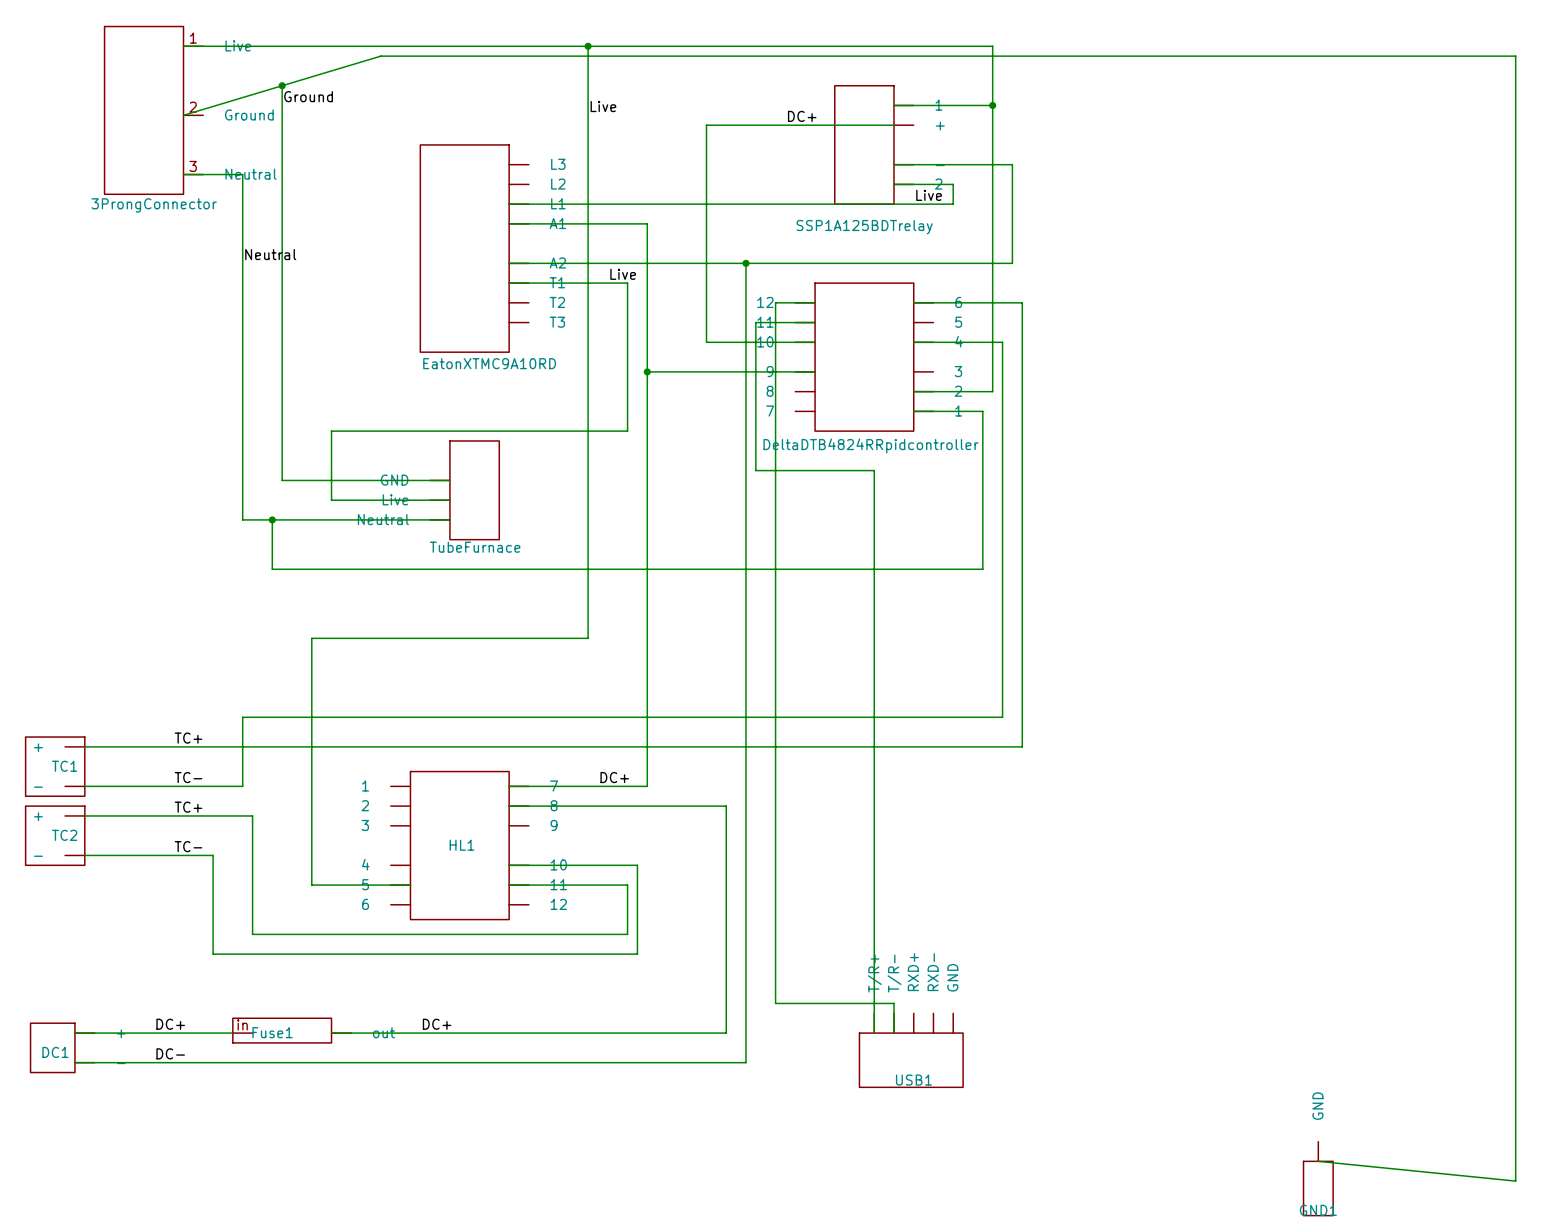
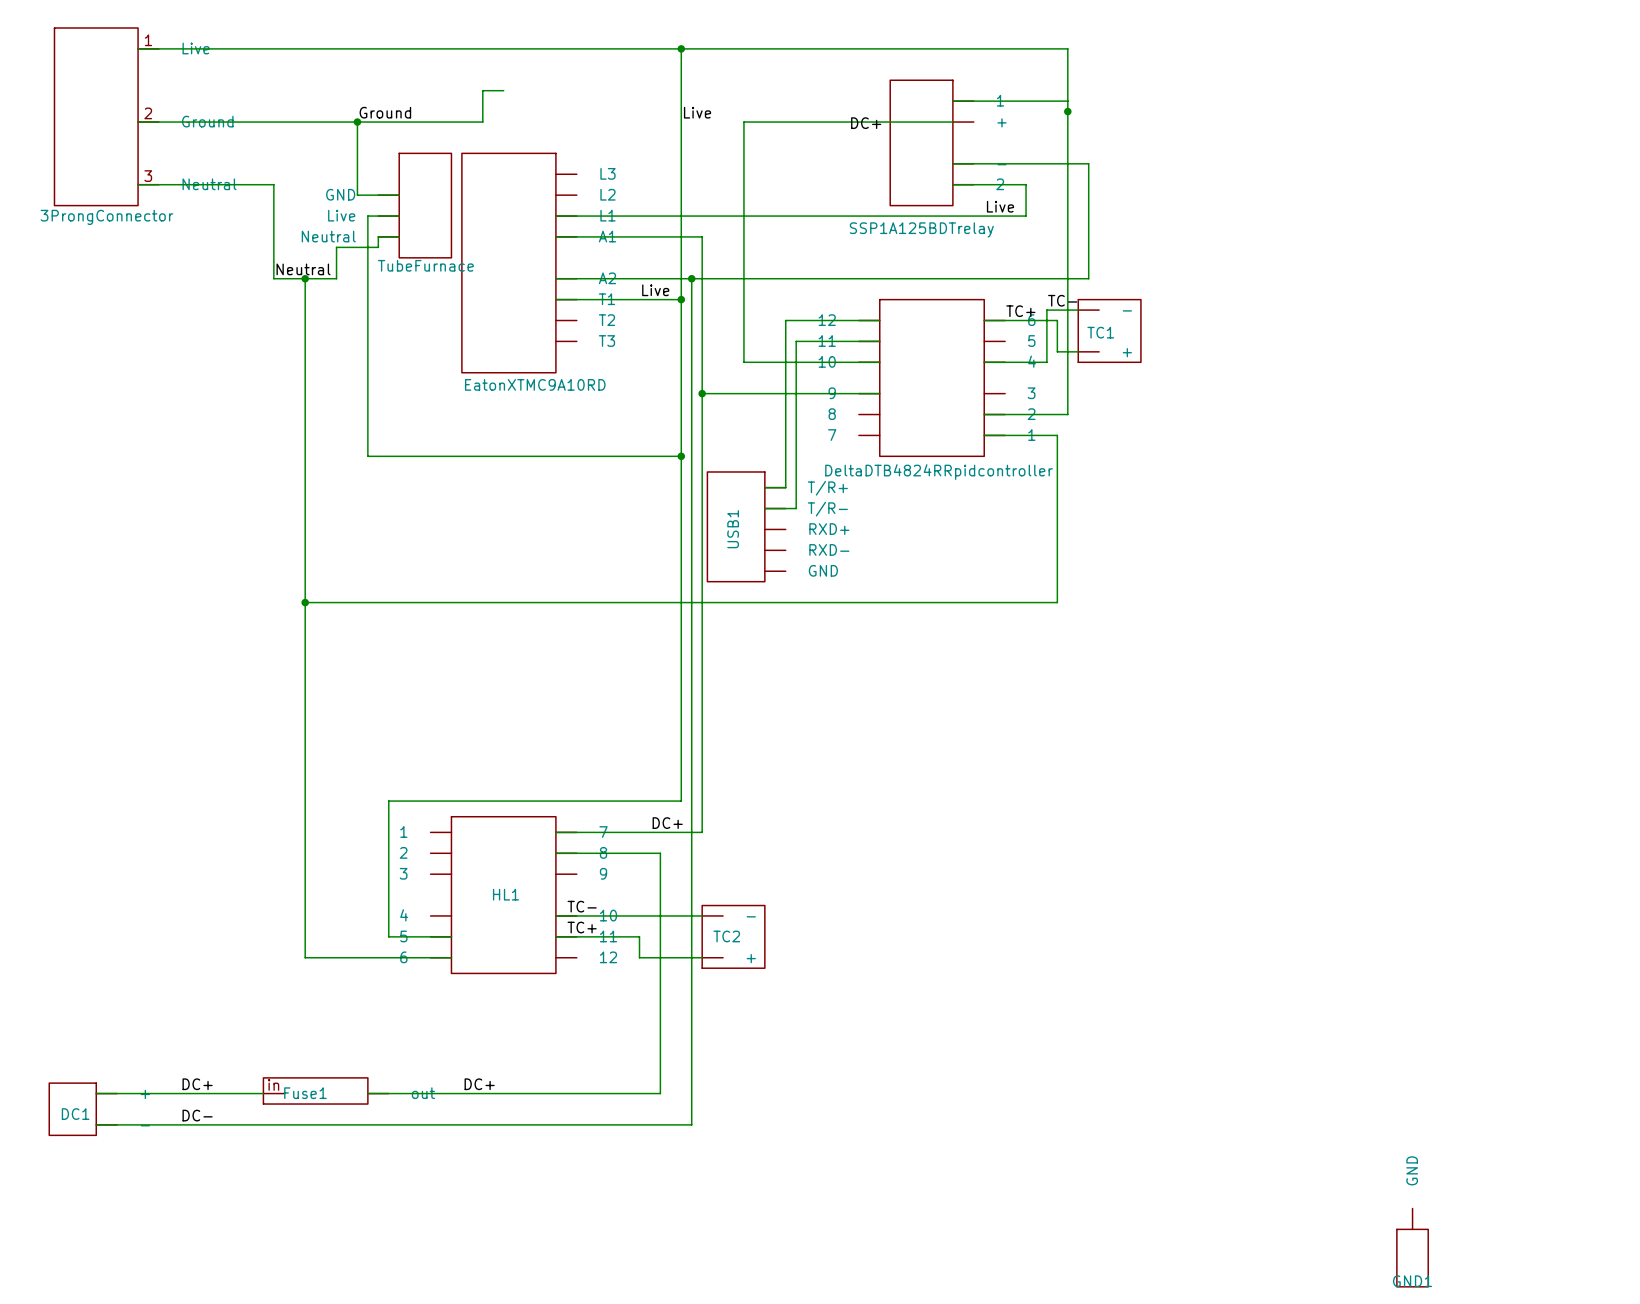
wire: none -> (138, 48) (211, 48)
wire: (588, 46) (588, 638) (311, 638) (311, 885) (351, 885) -> (681, 456) (681, 801) (388, 801) (388, 936)
junction position: (588, 46) -> (681, 48)
wire: none -> (681, 48) (681, 299)
wire: (282, 85) (282, 480) (449, 480) -> none
junction: (282, 85) -> none
wire: none -> (503, 90) (482, 90) (482, 122) (138, 122)
wire: none -> (952, 101) (1067, 101)
label position: Ground (308, 96) -> Ground (385, 112)
wire: (894, 105) (992, 105) -> none
label position: Live (603, 106) -> Live (697, 112)
3ProngConnector position: (153, 110) -> (106, 116)
wire: (183, 115) (380, 56) (1515, 56) (1515, 1181) (1318, 1161) -> none
wire: none -> (357, 122) (357, 195) (399, 195)
junction: none -> (357, 122)
wire: (894, 125) (706, 125) (706, 342) -> (952, 122) (743, 122) (743, 362) (764, 362)
SSP1A125BDTrelay position: (874, 144) -> (932, 142)
wire: (894, 164) (1012, 164) -> (952, 163) (1088, 163) (1088, 174)
wire: none -> (138, 184) (211, 184)
wire: (894, 184) (953, 184) -> (952, 184) (1026, 184) (1026, 195)
TubeFurnace: none -> (414, 205)
wire: (242, 263) (242, 519) (449, 519) -> (273, 278) (336, 278) (336, 247) (378, 247) (378, 236) (399, 236)
wire: none -> (305, 278) (305, 550)
junction: none -> (305, 278)
wire: none -> (691, 278) (691, 915) (702, 915)
junction: none -> (691, 278)
wire: (745, 263) (745, 1062) (637, 1062) -> none
junction: (745, 263) -> none
label position: Live (623, 274) -> Live (655, 290)
junction: none -> (681, 299)
label: none -> TC- (1062, 300)
label: none -> TC+ (1020, 311)
wire: (775, 302) (775, 1003) (894, 1003) (894, 1033) -> (837, 320) (785, 320) (785, 487) (764, 487)
wire: (982, 302) (1022, 302) (1022, 746) (84, 746) -> (1057, 320) (1057, 351) (1078, 351)
wire: (755, 322) (755, 470) (874, 470) (874, 1033) -> (817, 341) (796, 341) (796, 508) (764, 508)
wire: (972, 342) (1002, 342) (1002, 717) (242, 717) (242, 786) (84, 786) -> (1046, 362) (1046, 310) (1078, 310)
wire: (331, 431) (331, 500) (449, 500) -> (367, 456) (367, 216) (399, 216)
junction: none -> (681, 456)
TubeFurnace: (464, 490) -> none
junction: (272, 519) -> none
wire: none -> (305, 602) (305, 957) (451, 957)
junction: none -> (305, 602)
label: TC+ (188, 738) -> none
TC1 rotation: 0° (55, 766) -> 180° (1109, 330)
TC1 position: (55, 766) -> (1109, 330)
label: TC- (188, 777) -> none
wire: (607, 806) (726, 806) (726, 1033) (607, 1033) -> (660, 853) (660, 1093)
label: TC+ (188, 807) -> none
wire: (84, 815) (252, 815) (252, 934) (627, 934) (627, 885) (588, 885) -> (702, 957) (639, 957) (639, 936)
TC2 rotation: 0° (55, 835) -> 180° (733, 936)
TC2 position: (55, 835) -> (733, 936)
label: TC- (188, 846) -> none
wire: (84, 855) (213, 855) (213, 954) (637, 954) -> (691, 1124) (691, 1009)
label: none -> TC- (582, 906)
label: none -> TC+ (582, 927)
USB1 position: (911, 1050) -> (746, 526)
USB1 rotation: 0° (911, 1060) -> 90° clockwise (736, 526)
USB1 name position: USB1 (913, 1080) -> USB1 (733, 529)

